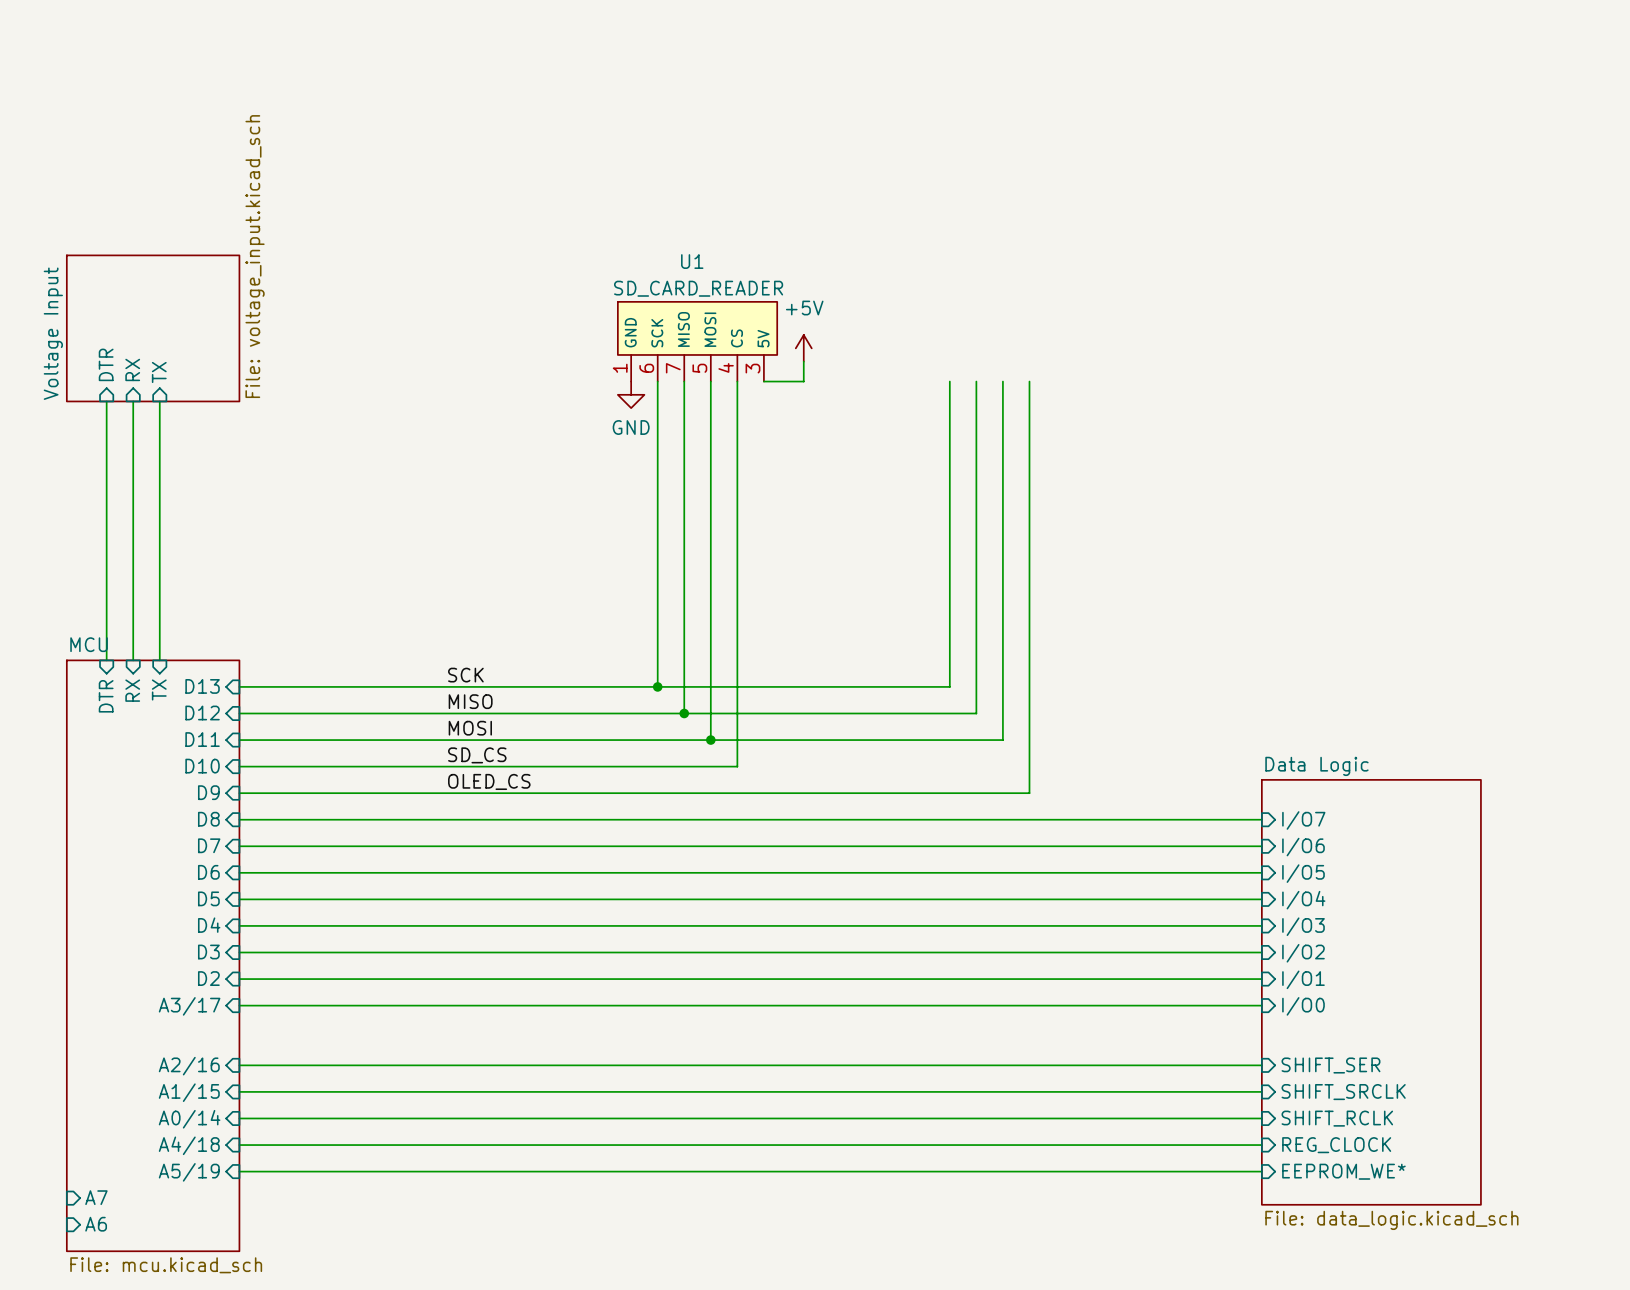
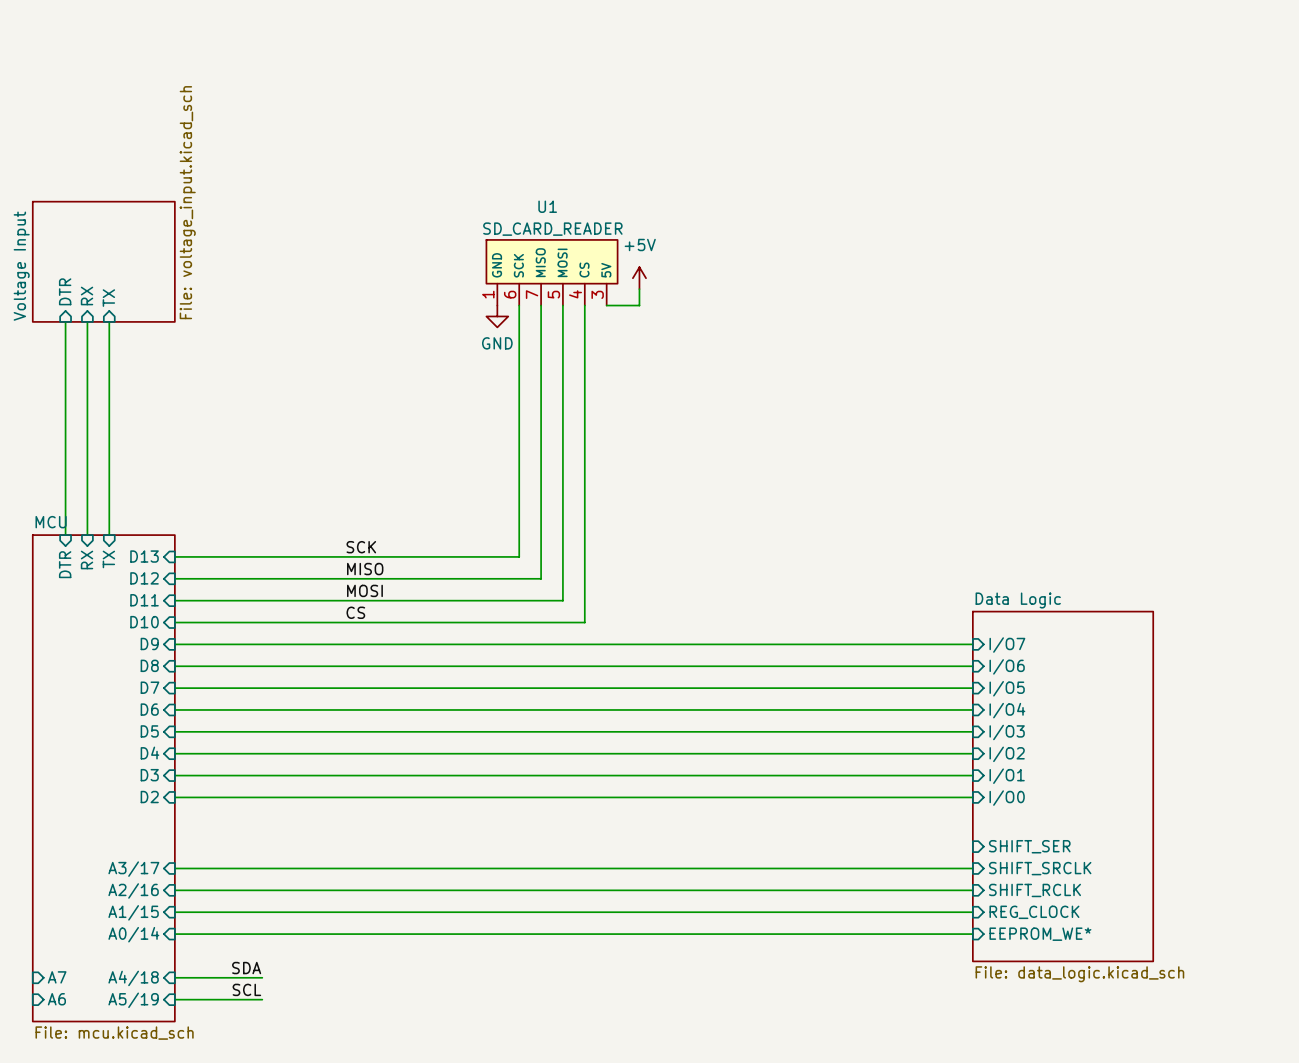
wire: (949, 381) (949, 686) (657, 686) -> none
wire: (976, 381) (976, 713) (684, 713) -> none
wire: (1002, 381) (1002, 740) (710, 740) -> none
wire: (1029, 381) (1029, 793) -> (972, 644) (825, 644)
junction: (657, 686) -> none
junction: (684, 713) -> none
junction: (710, 740) -> none
label: SD_CS (477, 755) -> CS (355, 612)
label: OLED_CS (489, 781) -> none
wire: (1208, 819) (1261, 819) -> none
sheet pin position: I/O7 (1303, 820) -> I/O7 (1007, 645)
wire: (1208, 846) (1261, 846) -> none
sheet pin position: I/O6 (1303, 847) -> I/O6 (1007, 666)
wire: (1208, 872) (1261, 872) -> none
sheet pin position: I/O5 (1303, 873) -> I/O5 (1007, 688)
wire: (1208, 899) (1261, 899) -> none
sheet pin position: I/O4 (1303, 900) -> I/O4 (1007, 710)
wire: (1208, 925) (1261, 925) -> none
sheet pin position: I/O3 (1303, 926) -> I/O3 (1007, 732)
wire: (1208, 952) (1261, 952) -> none
sheet pin position: I/O2 (1303, 953) -> I/O2 (1007, 754)
wire: (1208, 979) (1261, 979) -> none
sheet pin position: I/O1 (1303, 979) -> I/O1 (1007, 776)
sheet Data Logic position: (1371, 992) -> (1063, 786)
wire: (239, 1005) (1261, 1005) -> none
sheet pin: A3/17 (189, 1006) -> none
sheet pin position: I/O0 (1303, 1006) -> I/O0 (1007, 798)
wire: (1208, 1065) (1261, 1065) -> none
sheet pin position: SHIFT_SER (1330, 1065) -> SHIFT_SER (1029, 846)
sheet pin: A2/16 (189, 1066) -> A3/17 (133, 869)
wire: (1208, 1091) (1261, 1091) -> none
sheet pin: A1/15 (189, 1092) -> A2/16 (133, 890)
sheet pin position: SHIFT_SRCLK (1343, 1092) -> SHIFT_SRCLK (1040, 868)
wire: (1208, 1118) (1261, 1118) -> none
sheet pin position: SHIFT_RCLK (1337, 1118) -> SHIFT_RCLK (1034, 890)
sheet pin: A0/14 (189, 1119) -> A1/15 (133, 912)
sheet pin: A4/18 (189, 1145) -> A0/14 (133, 934)
wire: (1208, 1145) (1261, 1145) -> none
sheet pin position: REG_CLOCK (1336, 1145) -> REG_CLOCK (1034, 912)
wire: (239, 1171) (1261, 1171) -> none
sheet pin position: EEPROM_WE* (1343, 1171) -> EEPROM_WE* (1040, 934)
sheet pin position: A5/19 (189, 1172) -> A5/19 (133, 1000)
label: none -> SDA (246, 968)
sheet pin: none -> A4/18 (133, 978)
wire: none -> (174, 977) (262, 977)
label: none -> SCL (246, 989)
wire: none -> (174, 999) (262, 999)

